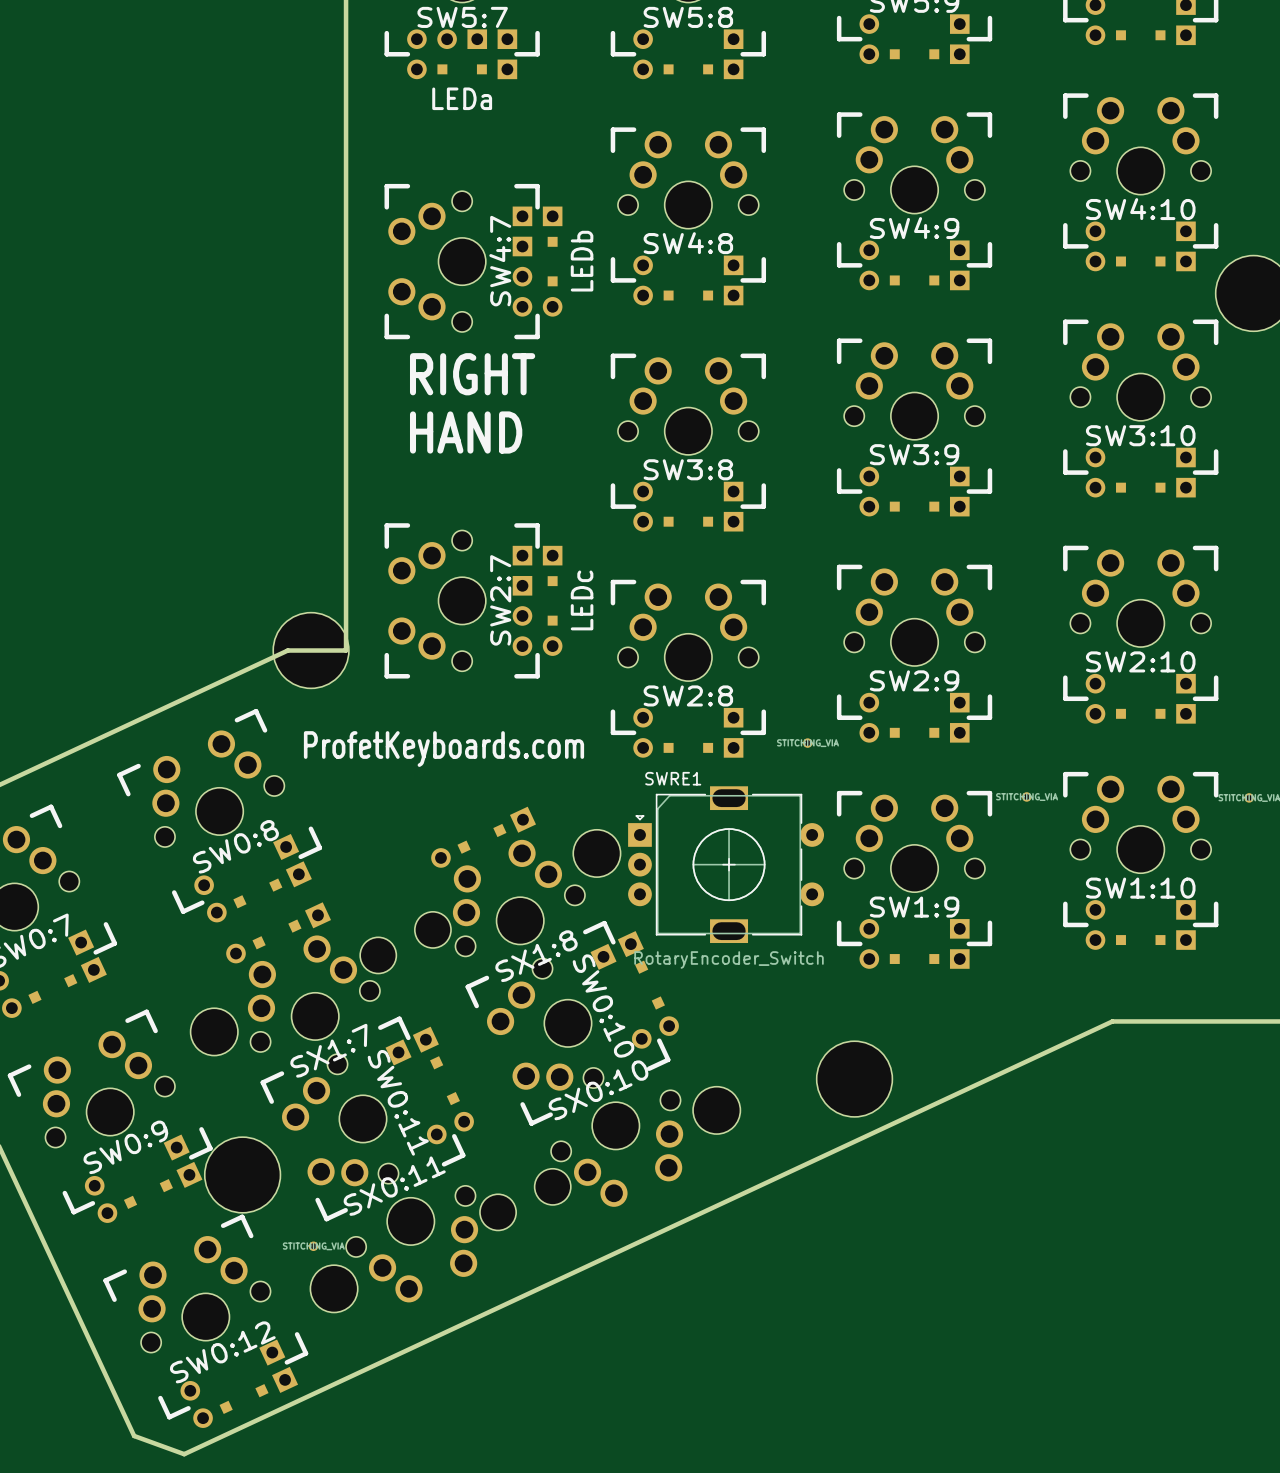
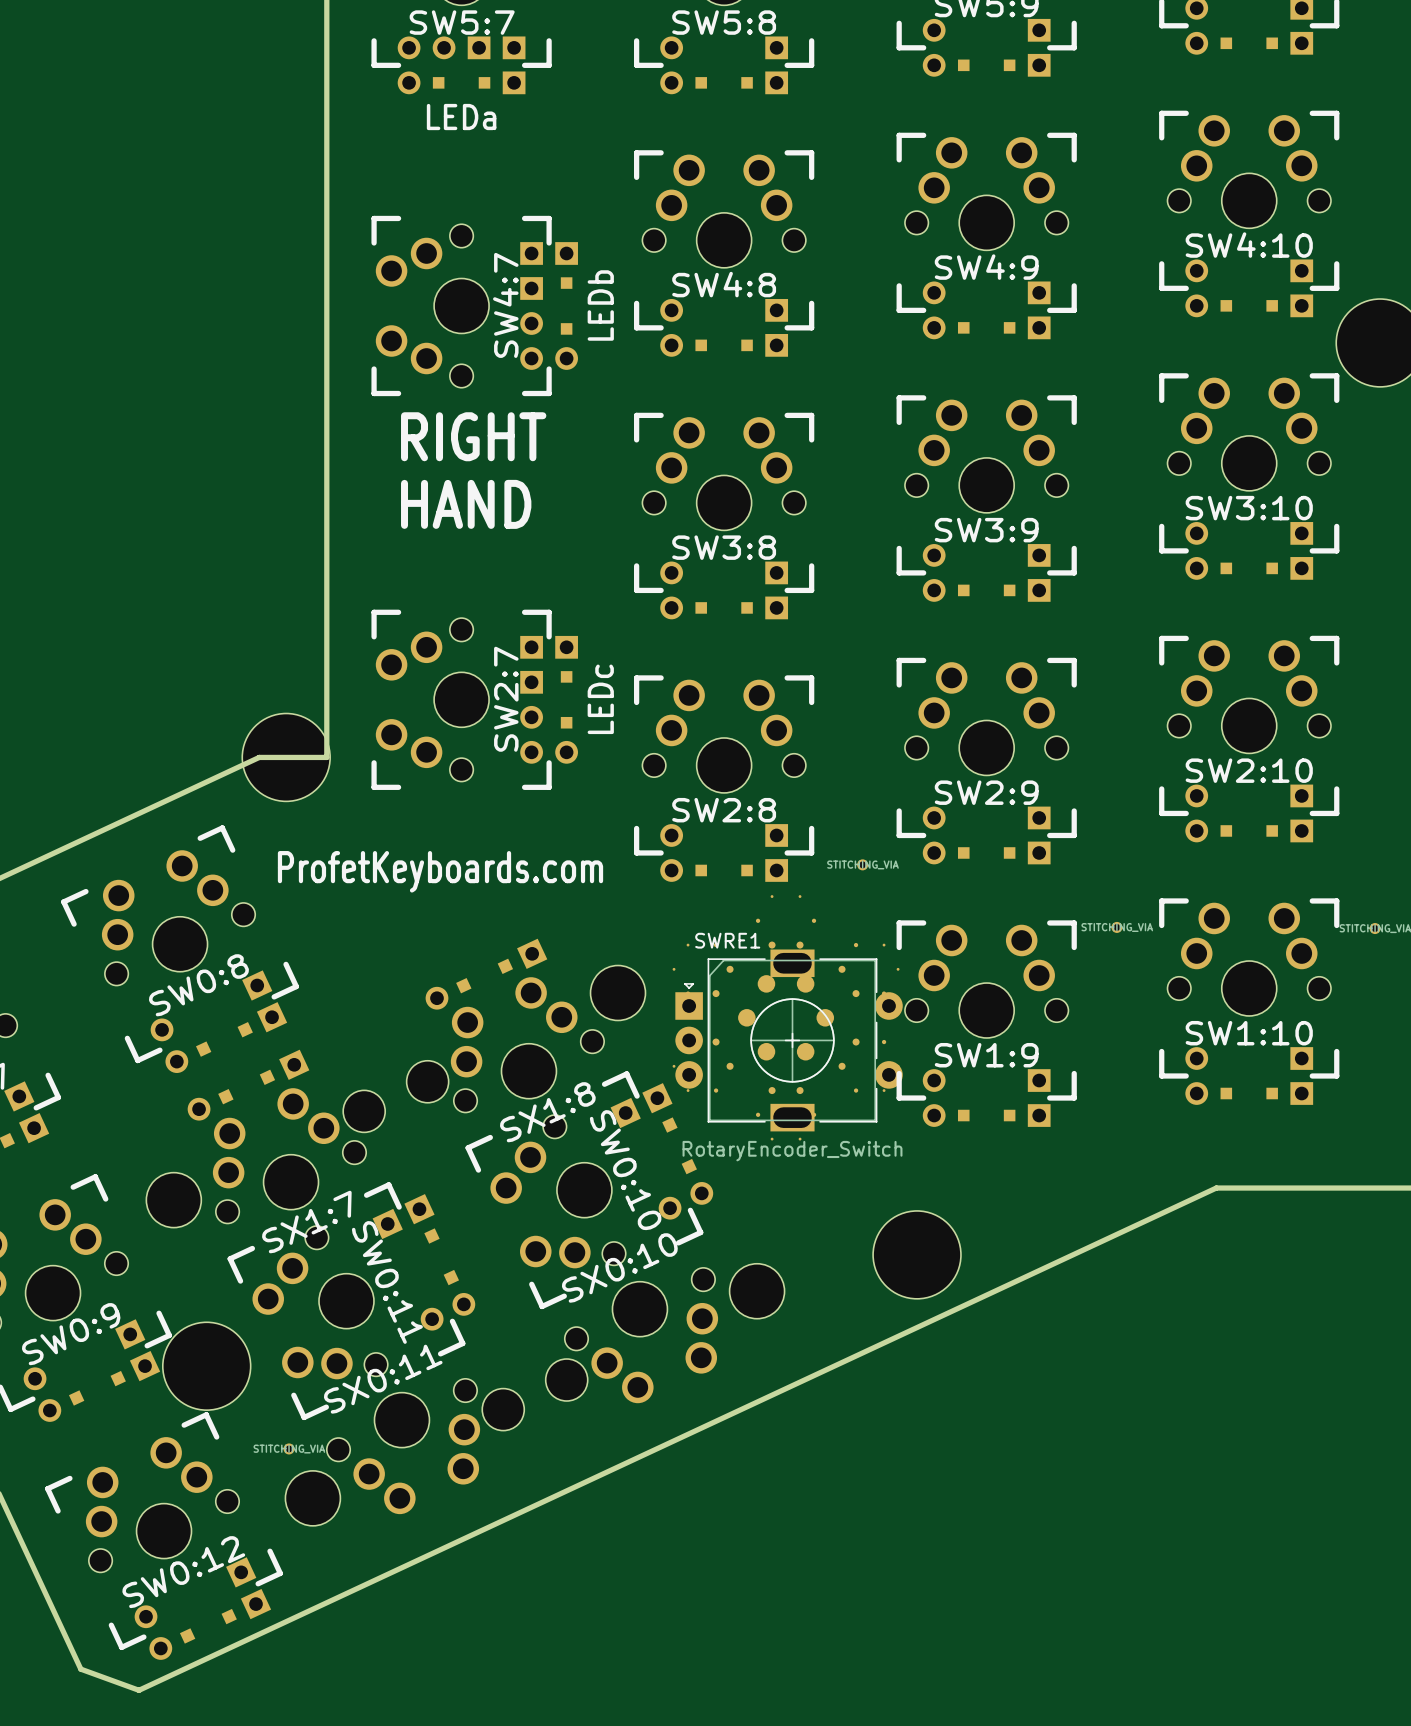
SWRE1 position: (726, 864) -> (789, 1040)
part: none -> (786, 1017)

